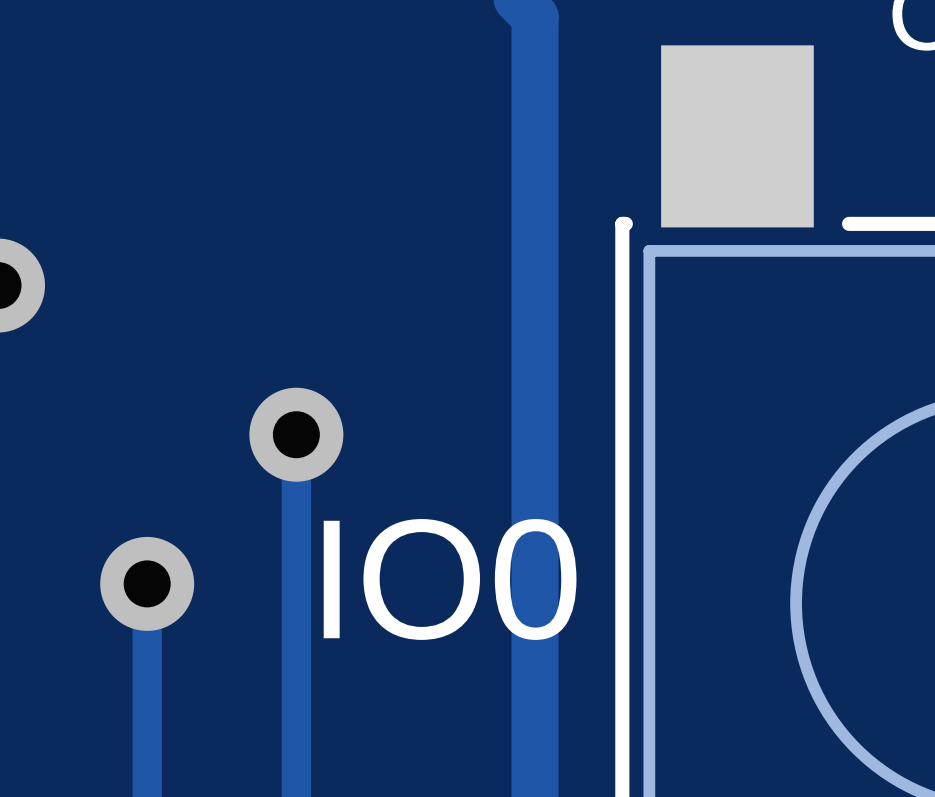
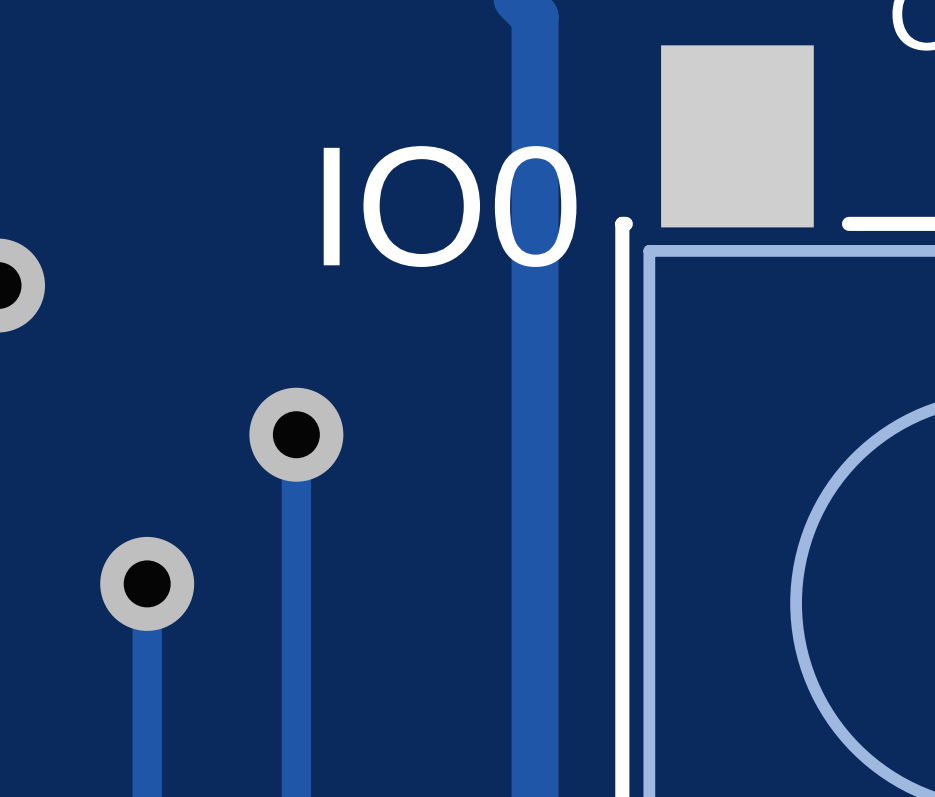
text position: IO0 (450, 579) -> IO0 (450, 206)

